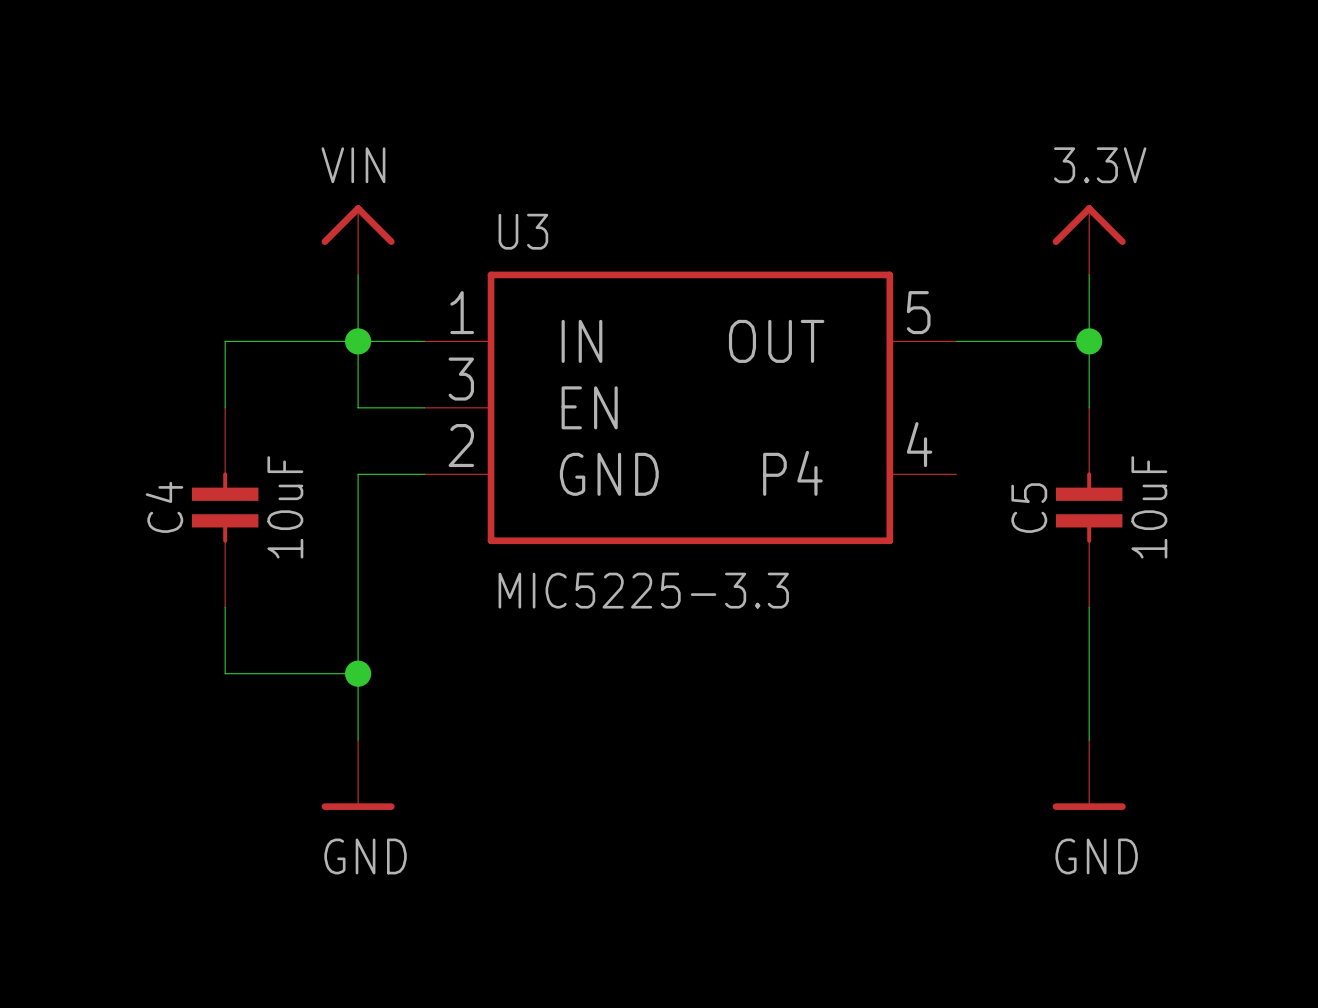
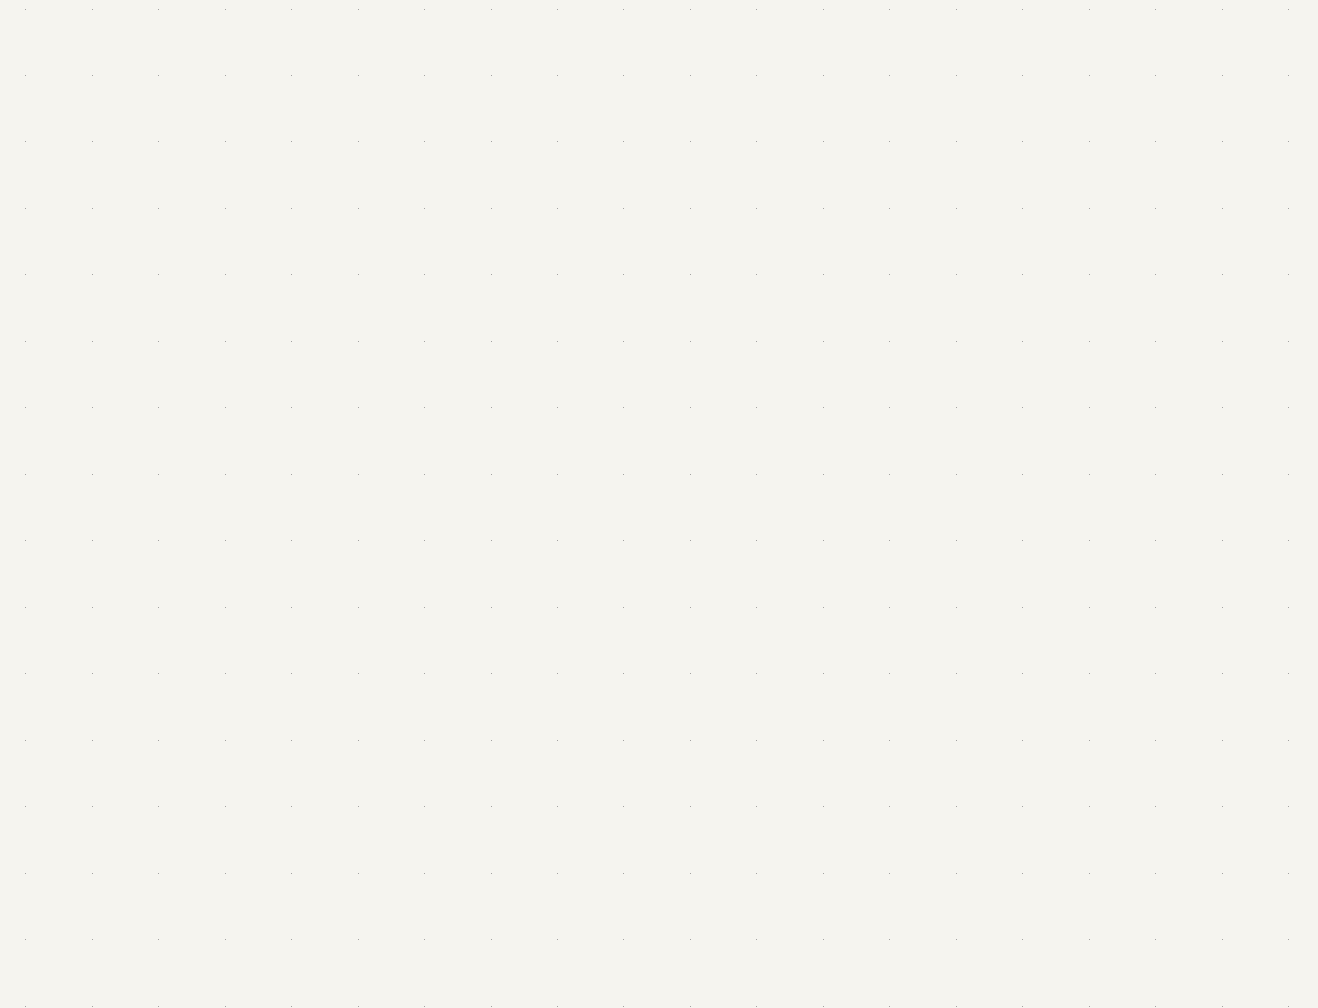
power symbol: VIN (358, 240) -> none
power symbol: 3.3V (1089, 240) -> none
wire: (358, 274) (358, 407) (424, 407) -> none
wire: (1089, 274) (1089, 407) -> none
junction: (358, 341) -> none
wire: (424, 341) (225, 341) (225, 407) -> none
wire: (956, 341) (1089, 341) -> none
junction: (1089, 341) -> none
U3: MIC5225-3.3 (690, 407) -> none
wire: (424, 474) (358, 474) (358, 740) -> none
C4: 10uF (225, 507) -> none
C5: 10uF (1089, 507) -> none
wire: (225, 607) (225, 673) (358, 673) -> none
wire: (1089, 607) (1089, 740) -> none
junction: (358, 673) -> none
power symbol: GND (358, 775) -> none
power symbol: GND (1089, 775) -> none

